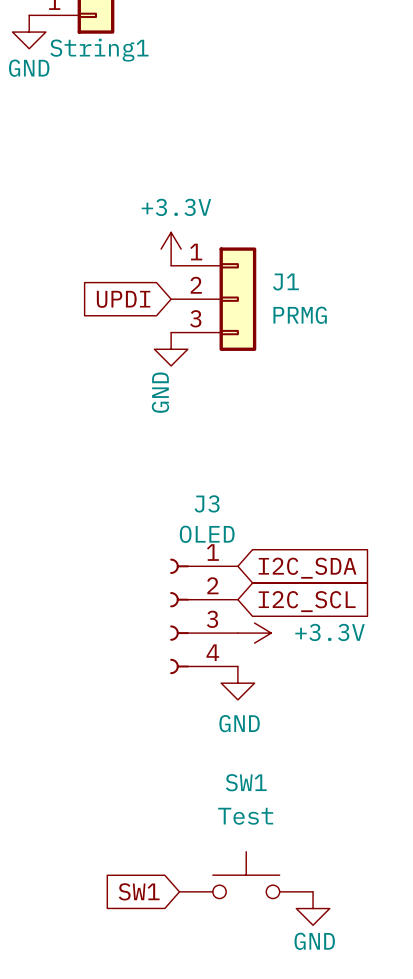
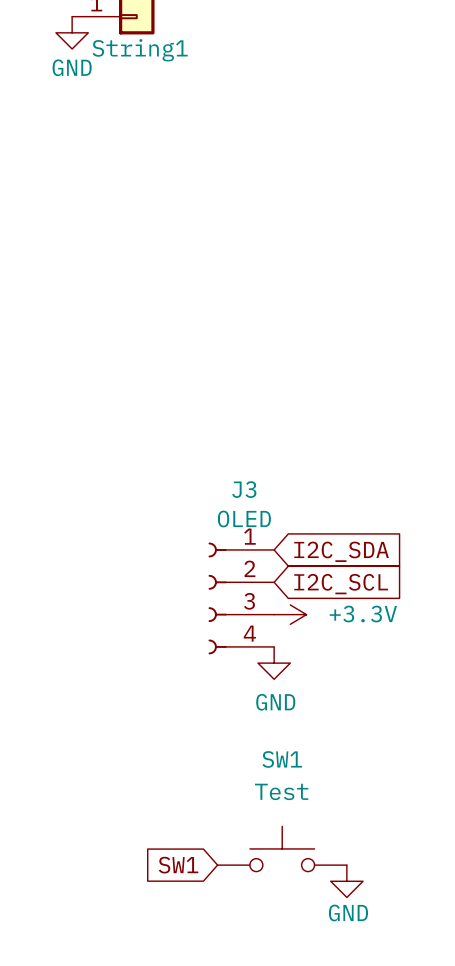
power symbol: +3.3V (171, 249) -> none
global label: UPDI (123, 299) -> none
J1: PRMG (213, 299) -> none
power symbol: GND (171, 349) -> none

